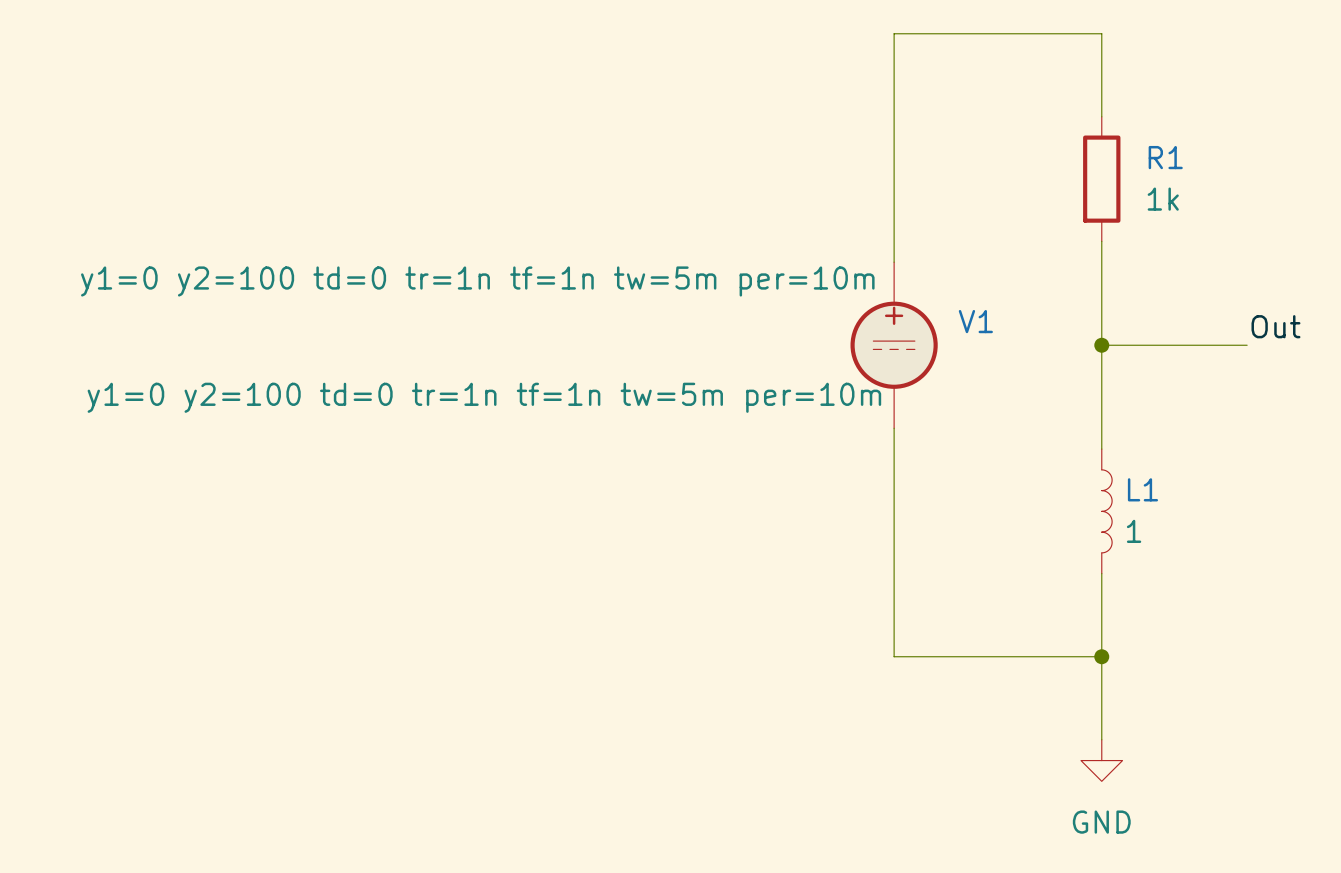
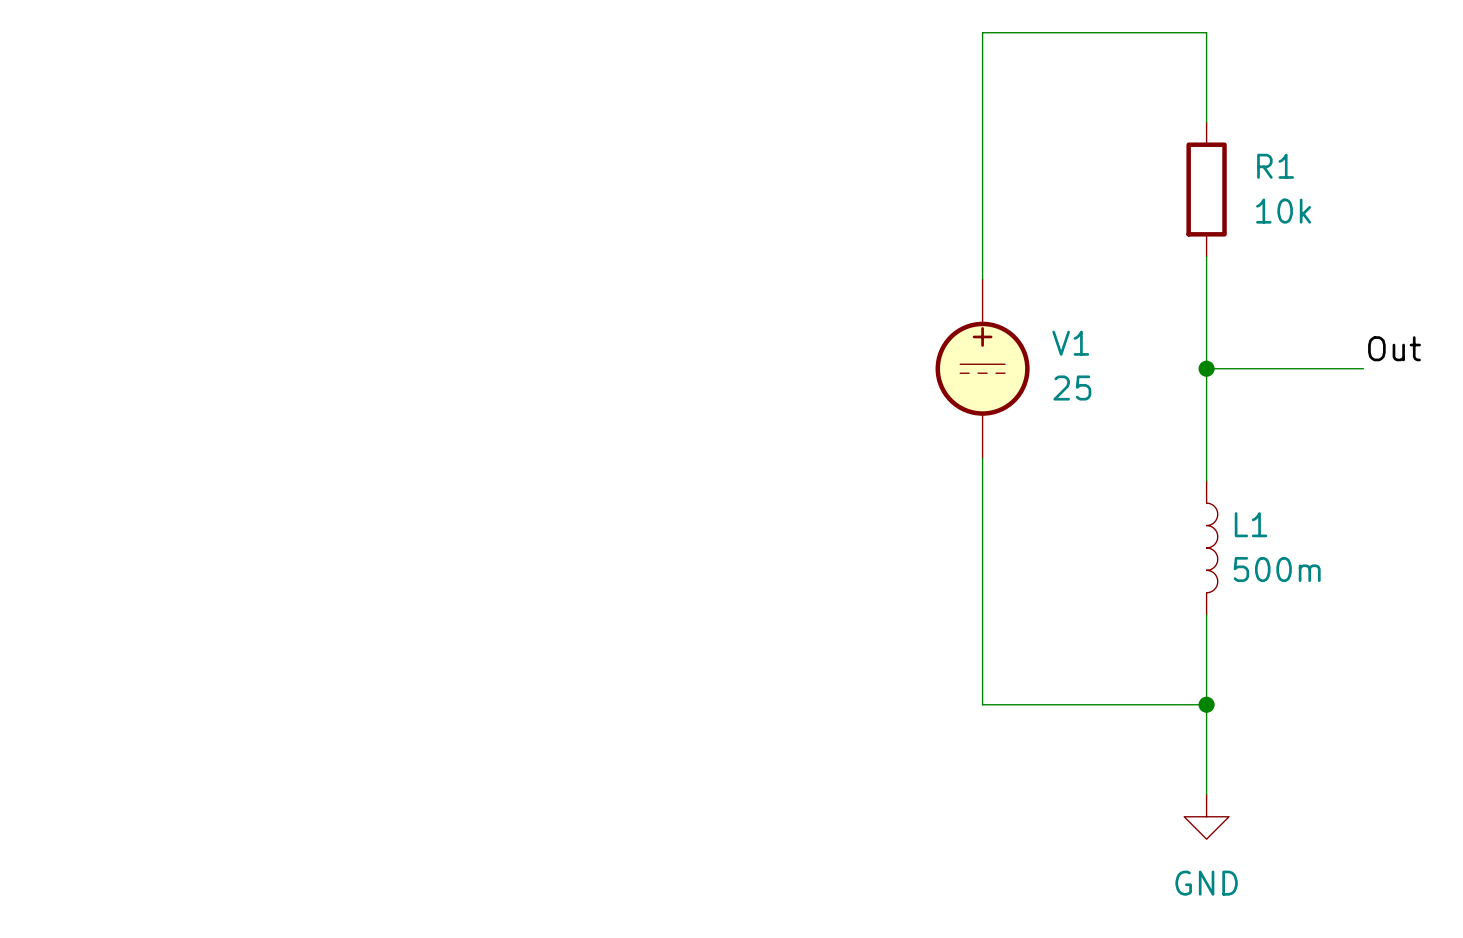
R1 value: 1k (1163, 199) -> 10k (1283, 211)
V1 text: y1=0 y2=100 td=0 tr=1n tf=1n tw=5m per=10m (477, 281) -> none
V1 value: y1=0 y2=100 td=0 tr=1n tf=1n tw=5m per=10m (484, 397) -> 25 (1072, 388)
L1 value: 1 (1134, 531) -> 500m (1277, 569)

